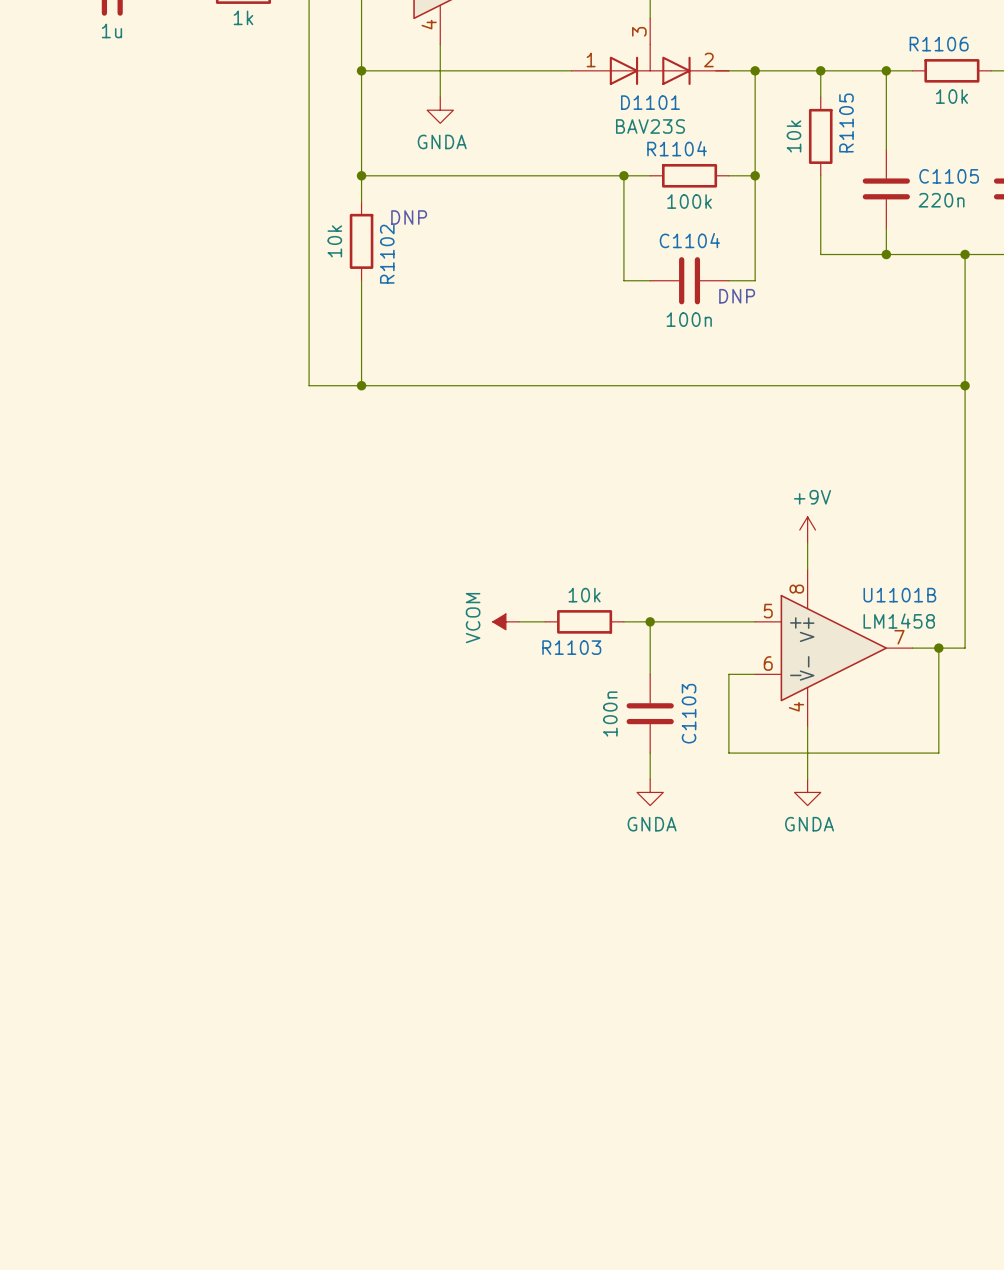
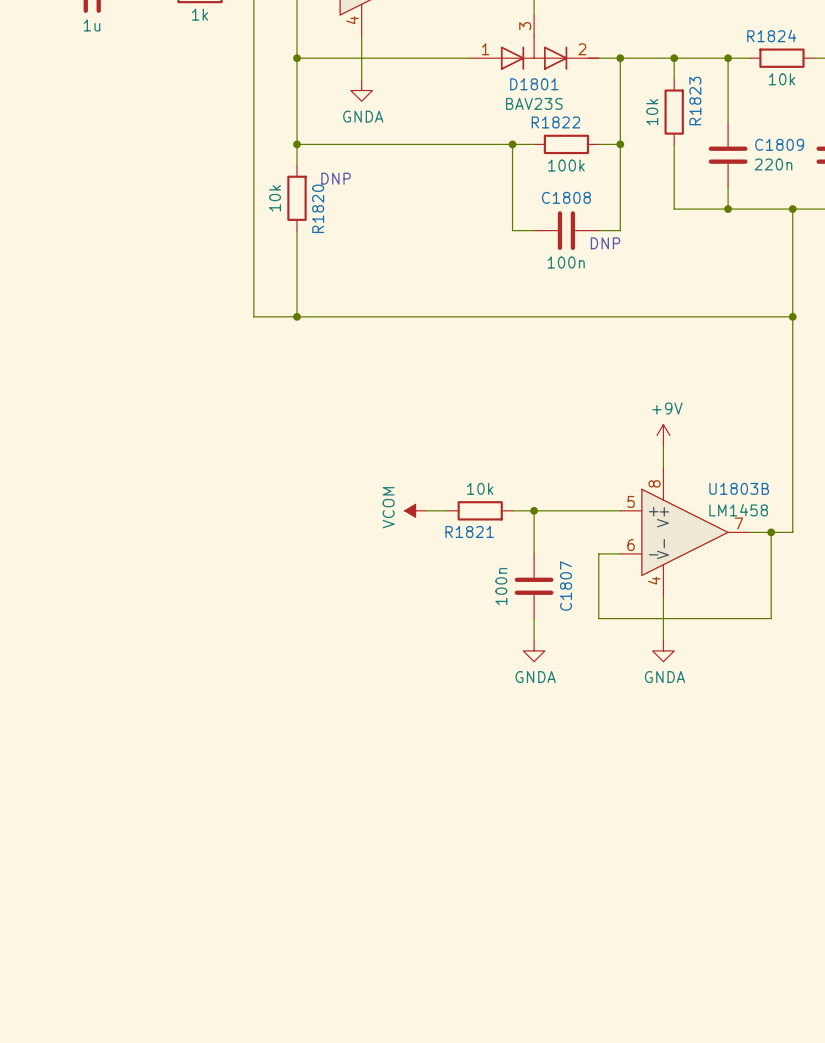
R1106 name: R1106 (939, 44) -> R1824 (771, 35)
D1101 name: D1101 (650, 102) -> D1801 (534, 84)
R1105 name: R1105 (846, 123) -> R1823 (695, 101)
R1104 name: R1104 (677, 148) -> R1822 (555, 122)
C1105 name: C1105 (949, 176) -> C1809 (779, 144)
C1104 name: C1104 (689, 240) -> C1808 (566, 197)
R1102 name: R1102 (387, 254) -> R1820 (318, 208)
U1101B name: U1101B (899, 595) -> U1803B (739, 488)
R1103 name: R1103 (571, 647) -> R1821 (469, 531)
C1103 name: C1103 (689, 713) -> C1807 (566, 586)

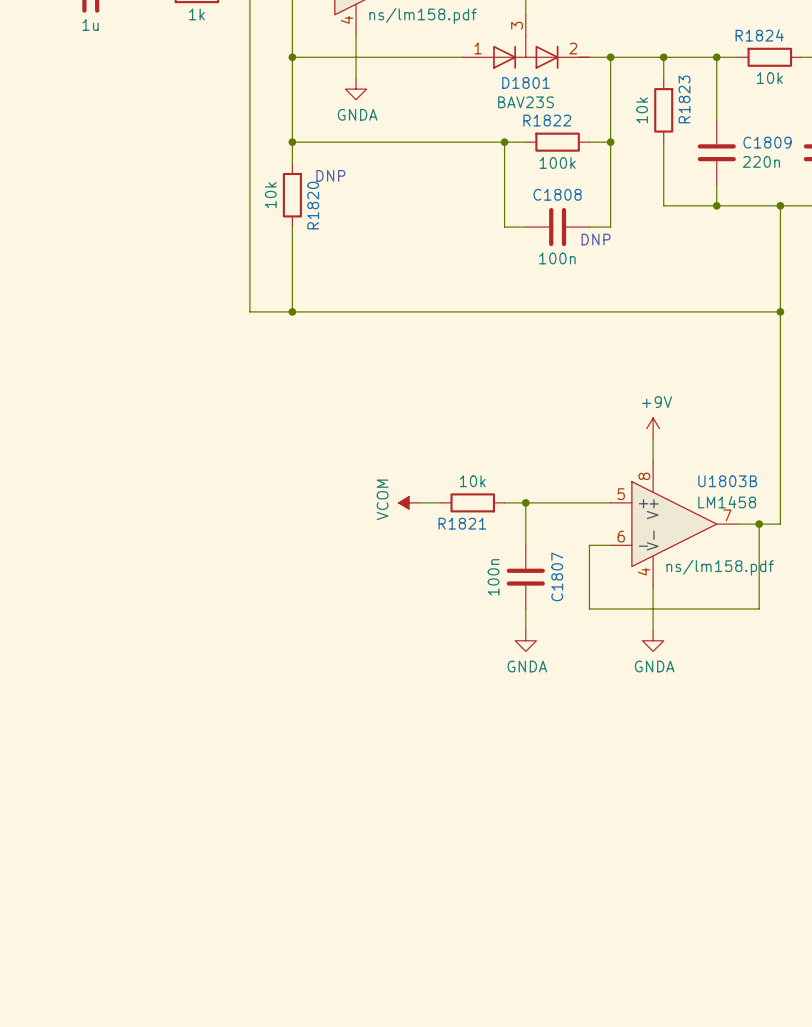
part text: none -> ns/lm158.pdf (423, 15)
U1803B text: none -> ns/lm158.pdf (720, 567)

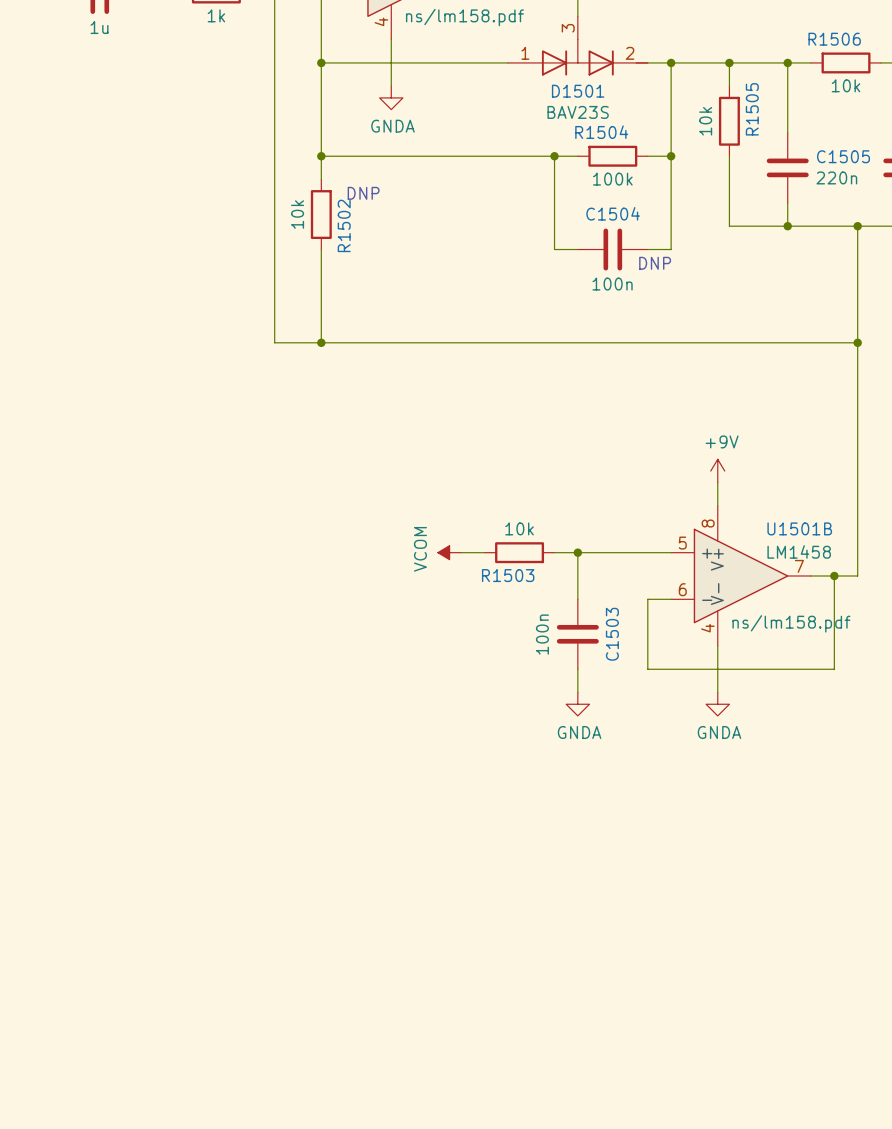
R1824 name: R1824 (759, 35) -> R1506 (834, 39)
D1801 name: D1801 (526, 82) -> D1501 (578, 91)
R1823 name: R1823 (684, 99) -> R1505 (752, 109)
R1822 name: R1822 (547, 120) -> R1504 (601, 132)
C1809 name: C1809 (767, 142) -> C1505 (843, 156)
C1808 name: C1808 (557, 194) -> C1504 (613, 213)
R1820 name: R1820 (313, 205) -> R1502 (344, 225)
U1803B name: U1803B (727, 481) -> U1501B (799, 528)
R1821 name: R1821 (462, 523) -> R1503 (508, 575)
C1807 name: C1807 (557, 576) -> C1503 (612, 634)

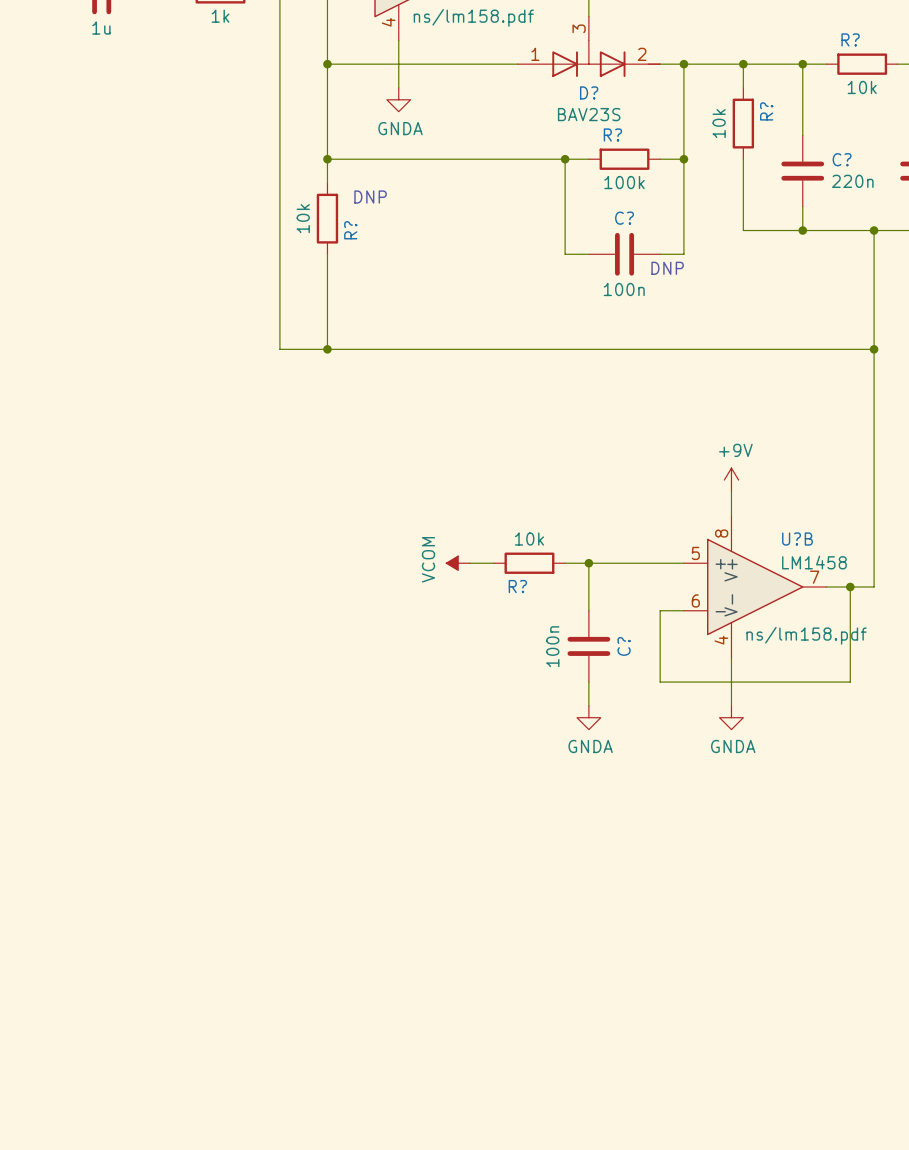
R1506 name: R1506 (834, 39) -> R? (850, 39)
D1501 name: D1501 (578, 91) -> D? (589, 92)
R1505 name: R1505 (752, 109) -> R? (766, 111)
R1504 name: R1504 (601, 132) -> R? (612, 135)
C1505 name: C1505 (843, 156) -> C? (842, 159)
C1504 name: C1504 (613, 213) -> C? (624, 218)
R1502 name: R1502 (344, 225) -> R? (350, 230)
U1501B name: U1501B (799, 528) -> U?B (797, 539)
R1503 name: R1503 (508, 575) -> R? (517, 586)
C1503 name: C1503 (612, 634) -> C? (624, 646)

